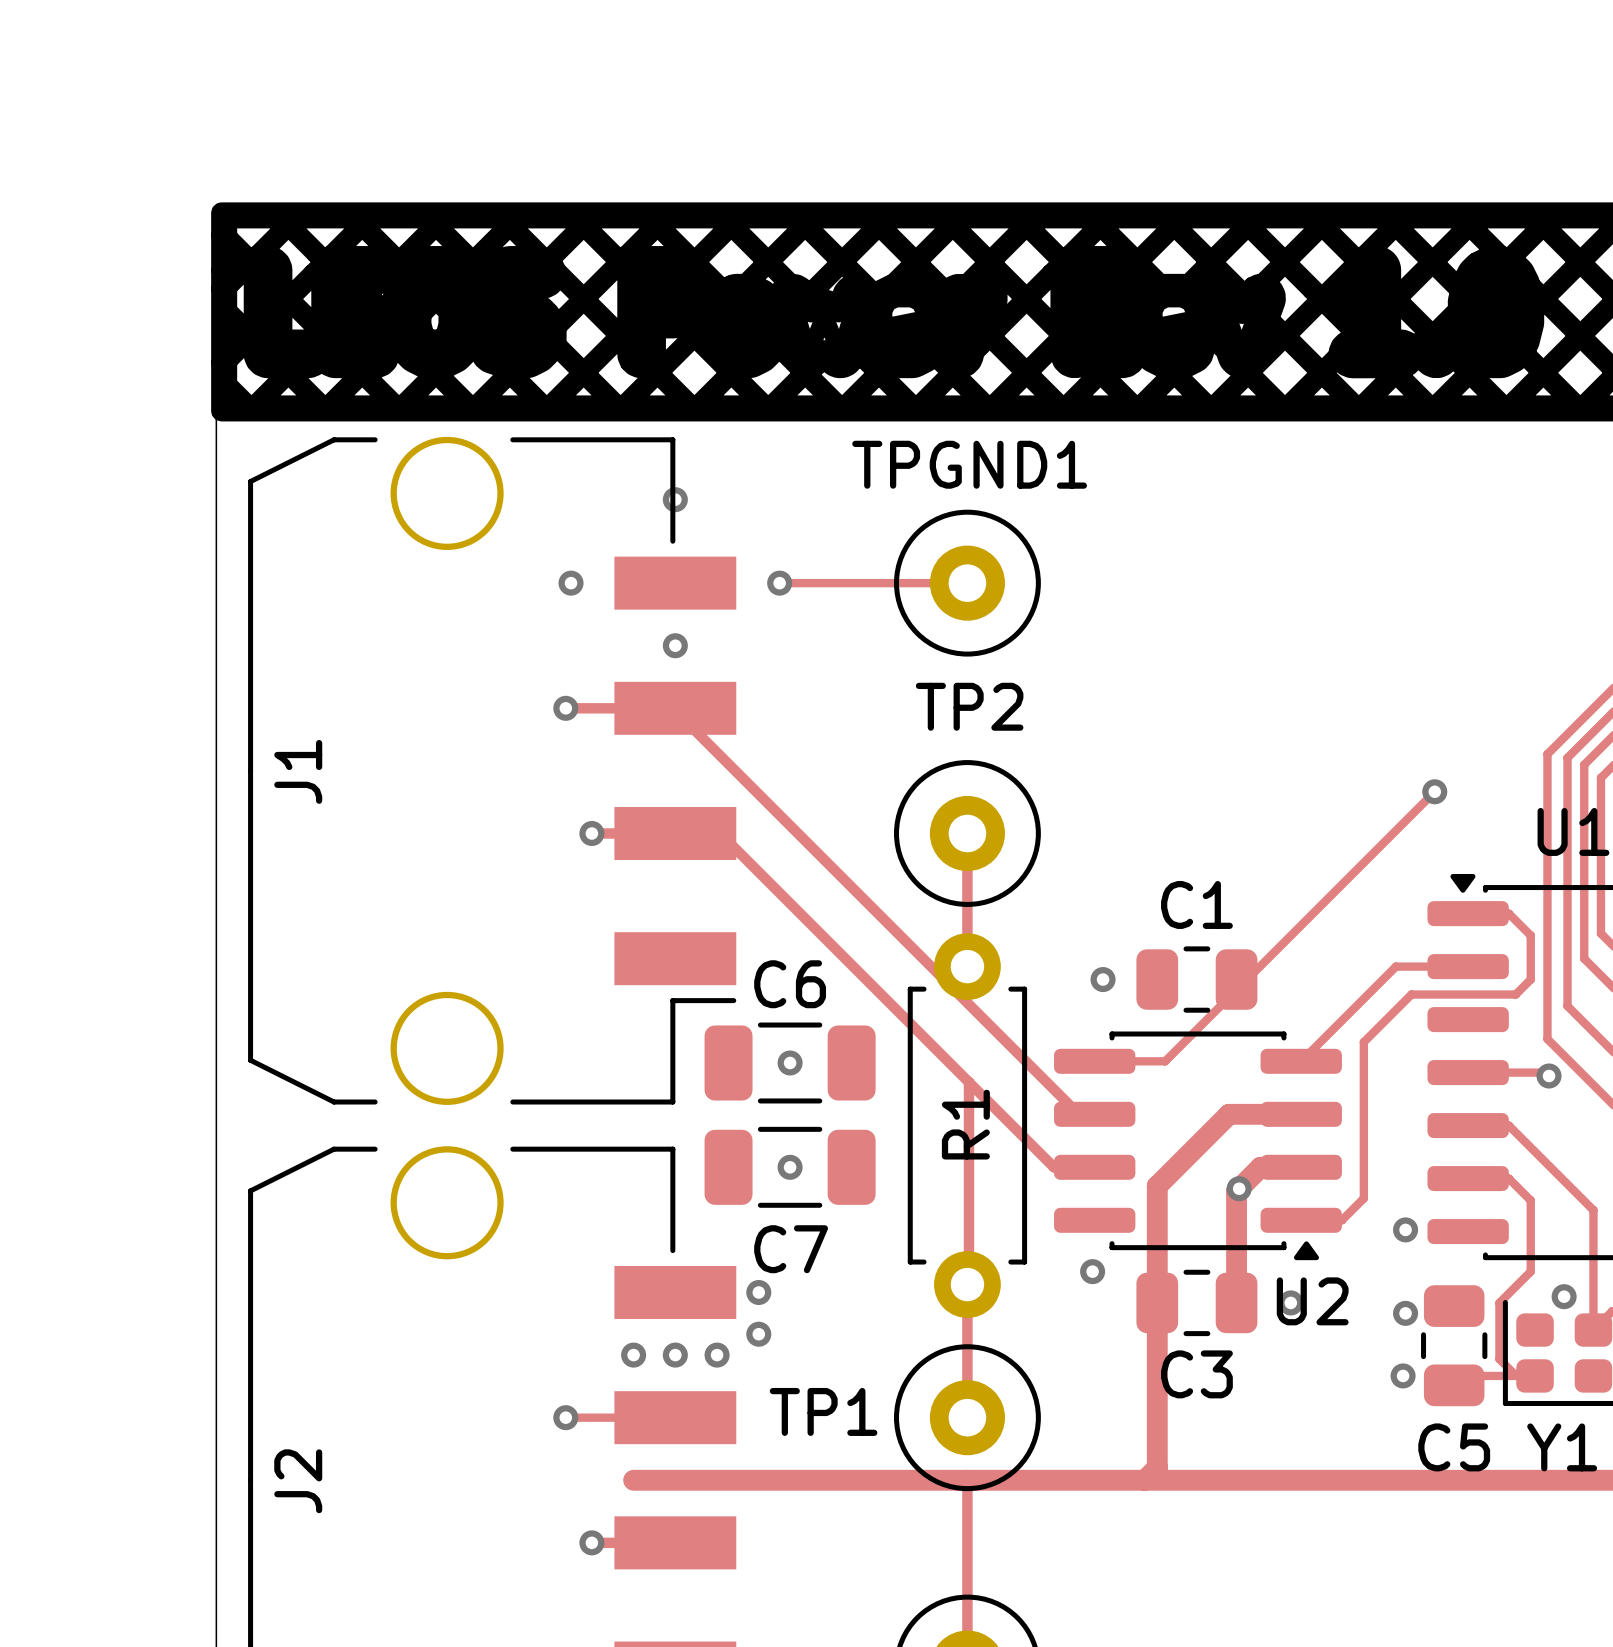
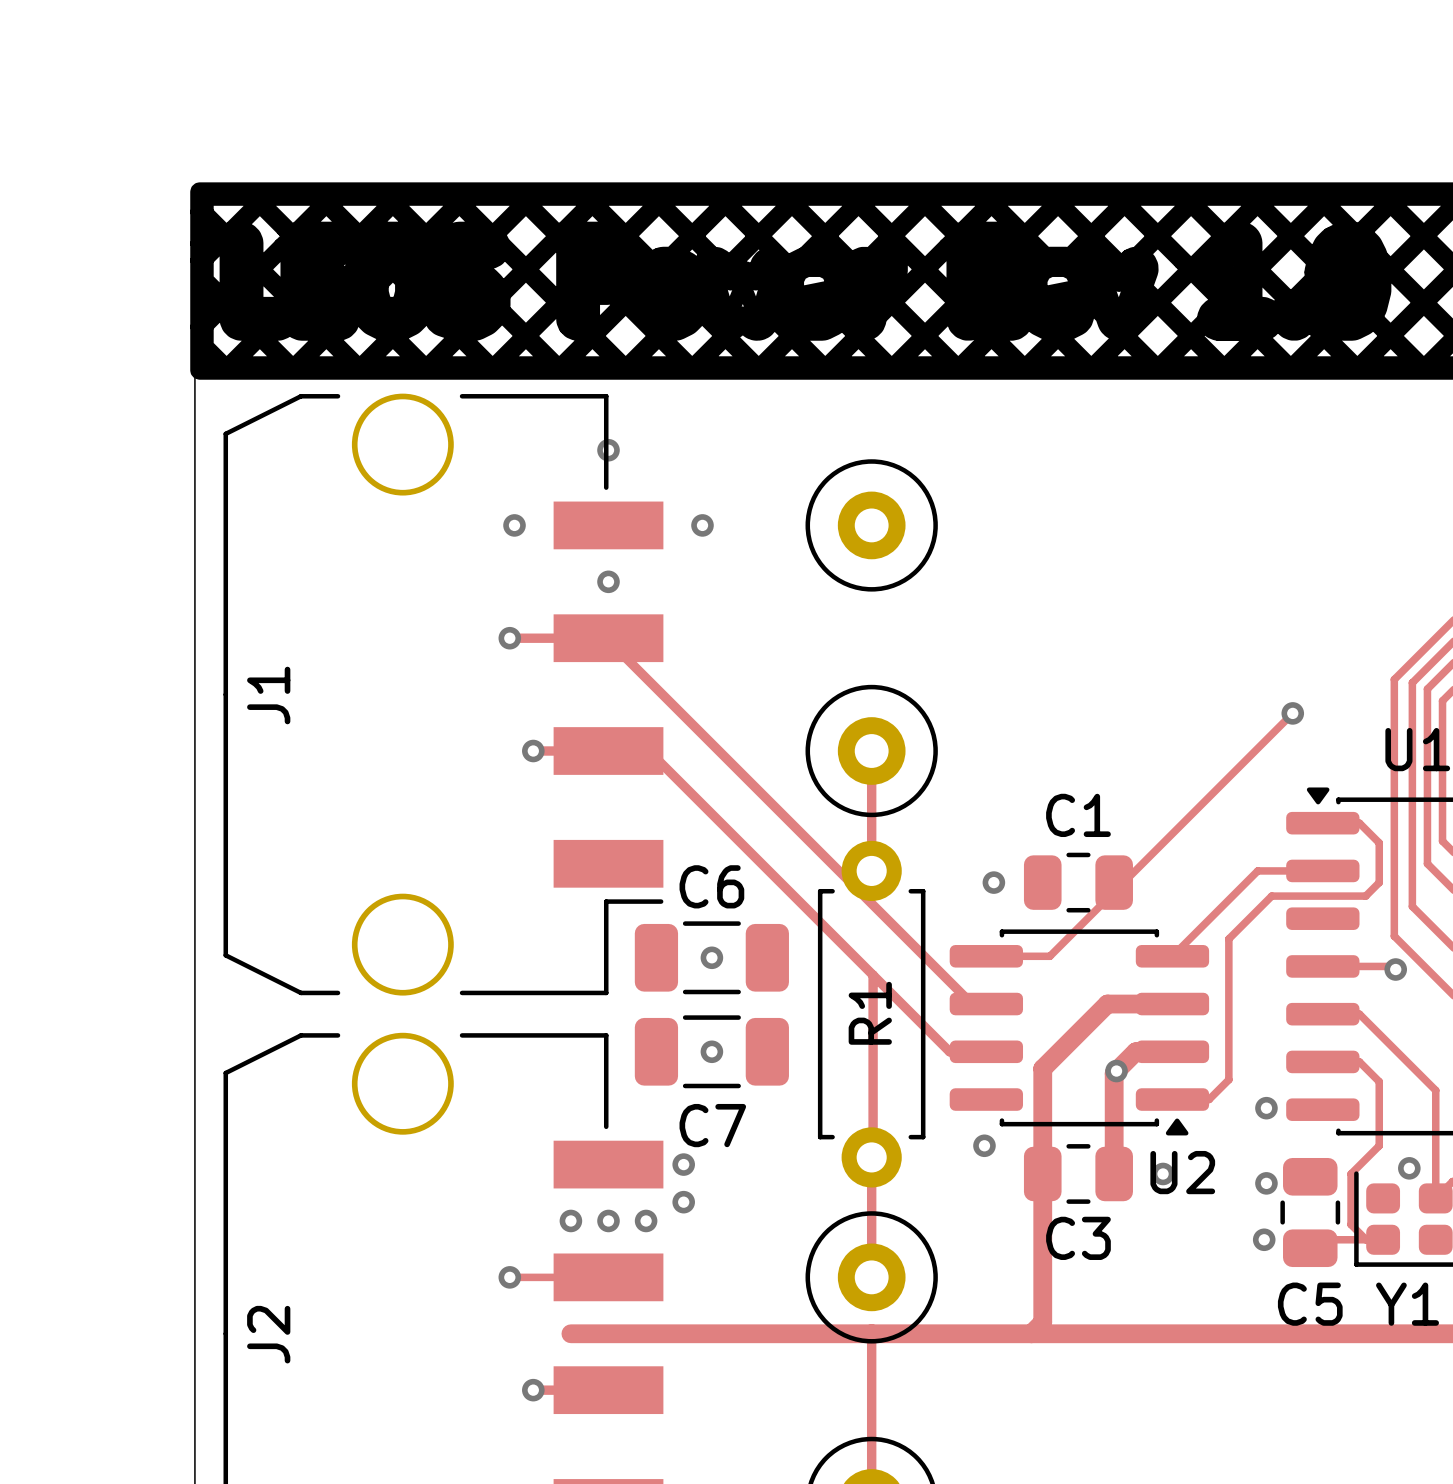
TPGND1 name: TPGND1 (969, 464) -> none
track: (779, 583) (967, 583) -> none
TP2 name: TP2 (969, 706) -> none
TP1 name: TP1 (823, 1411) -> none

